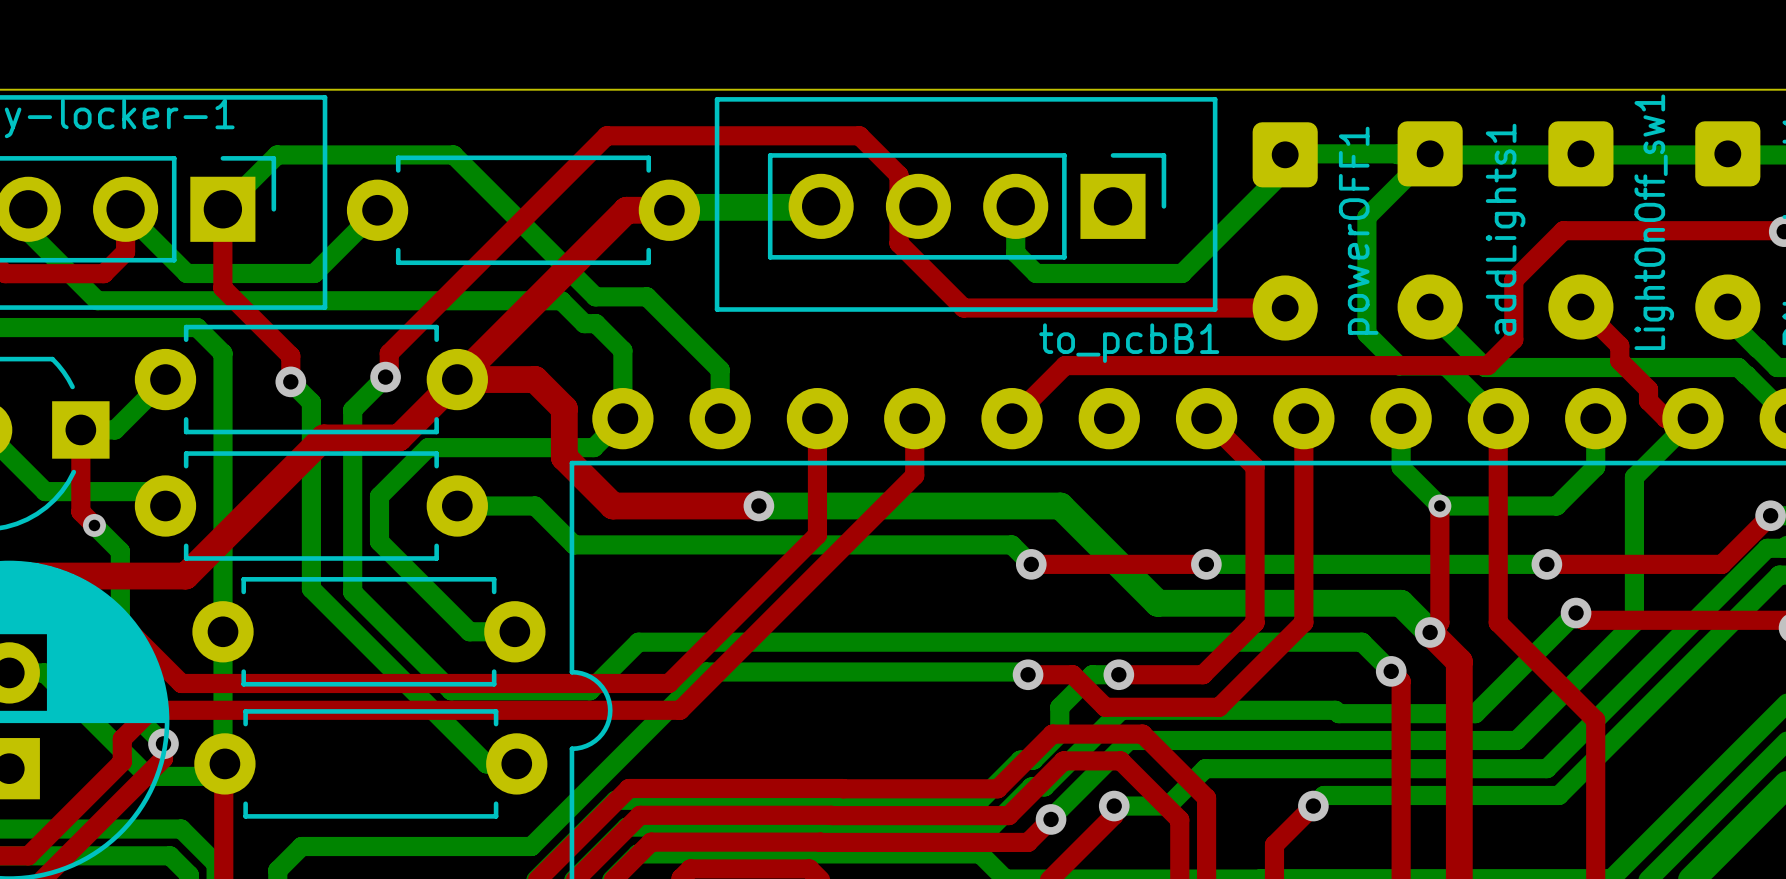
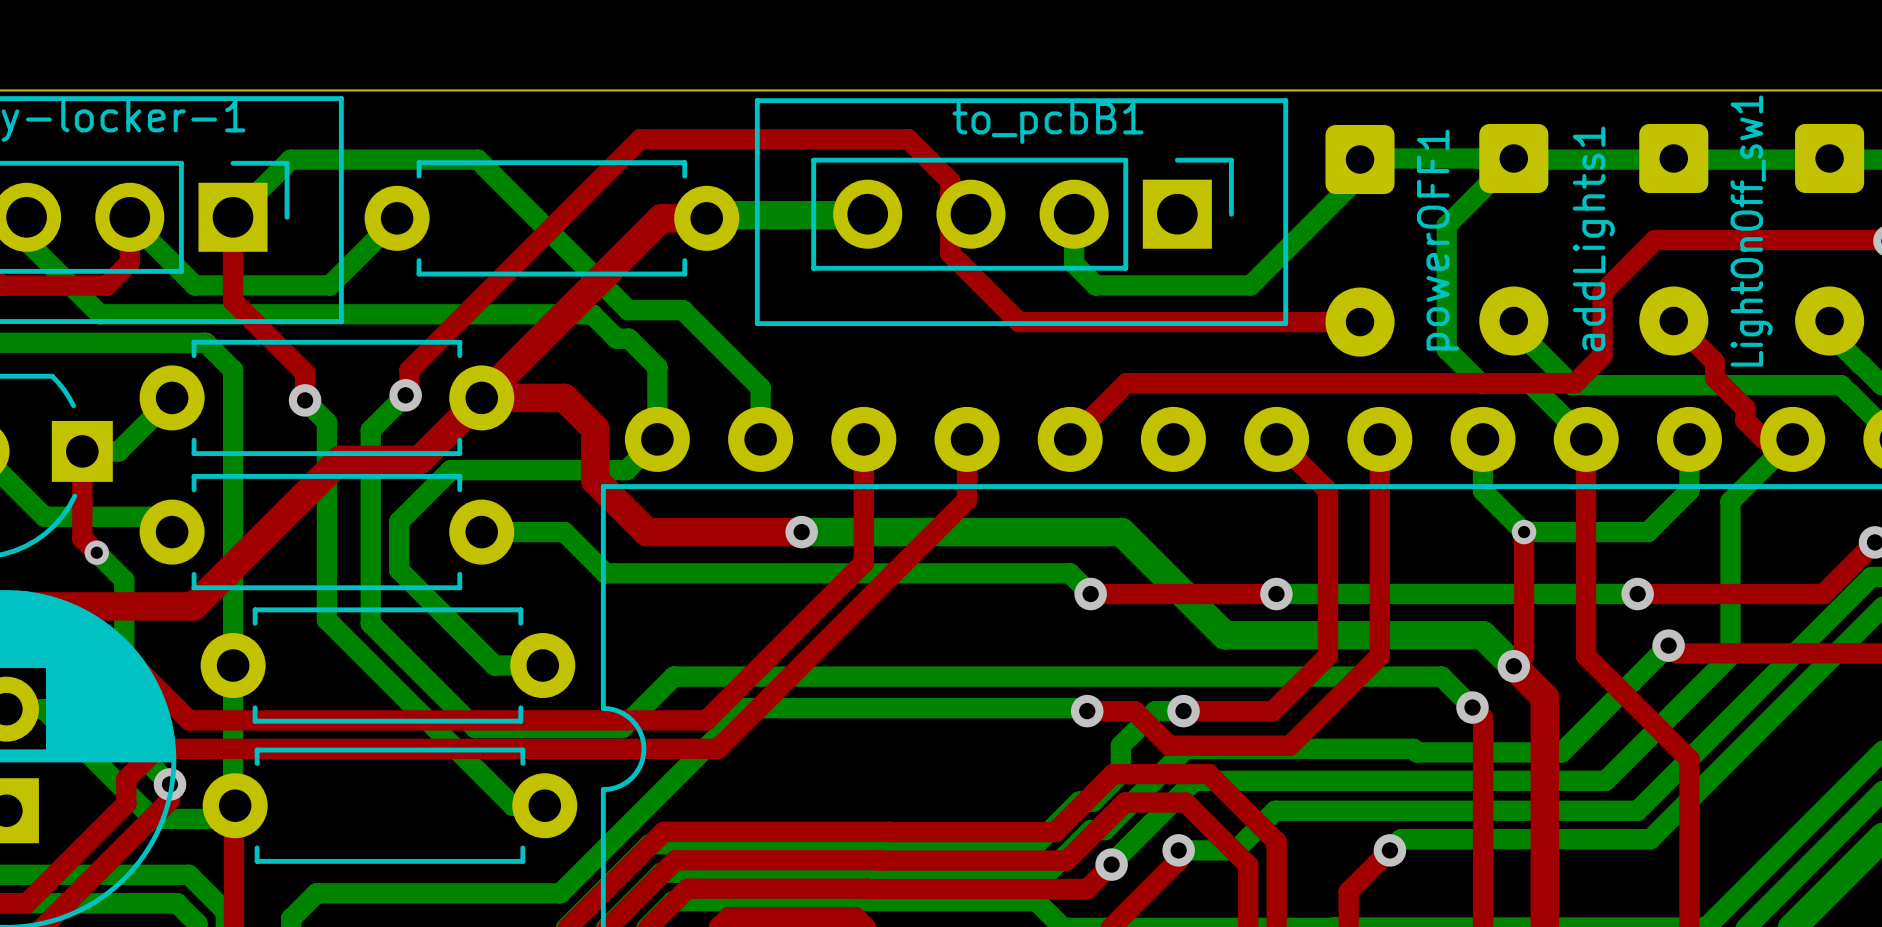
to_pcbB1 name position: to_pcbB1 (1129, 343) -> to_pcbB1 (1048, 122)

